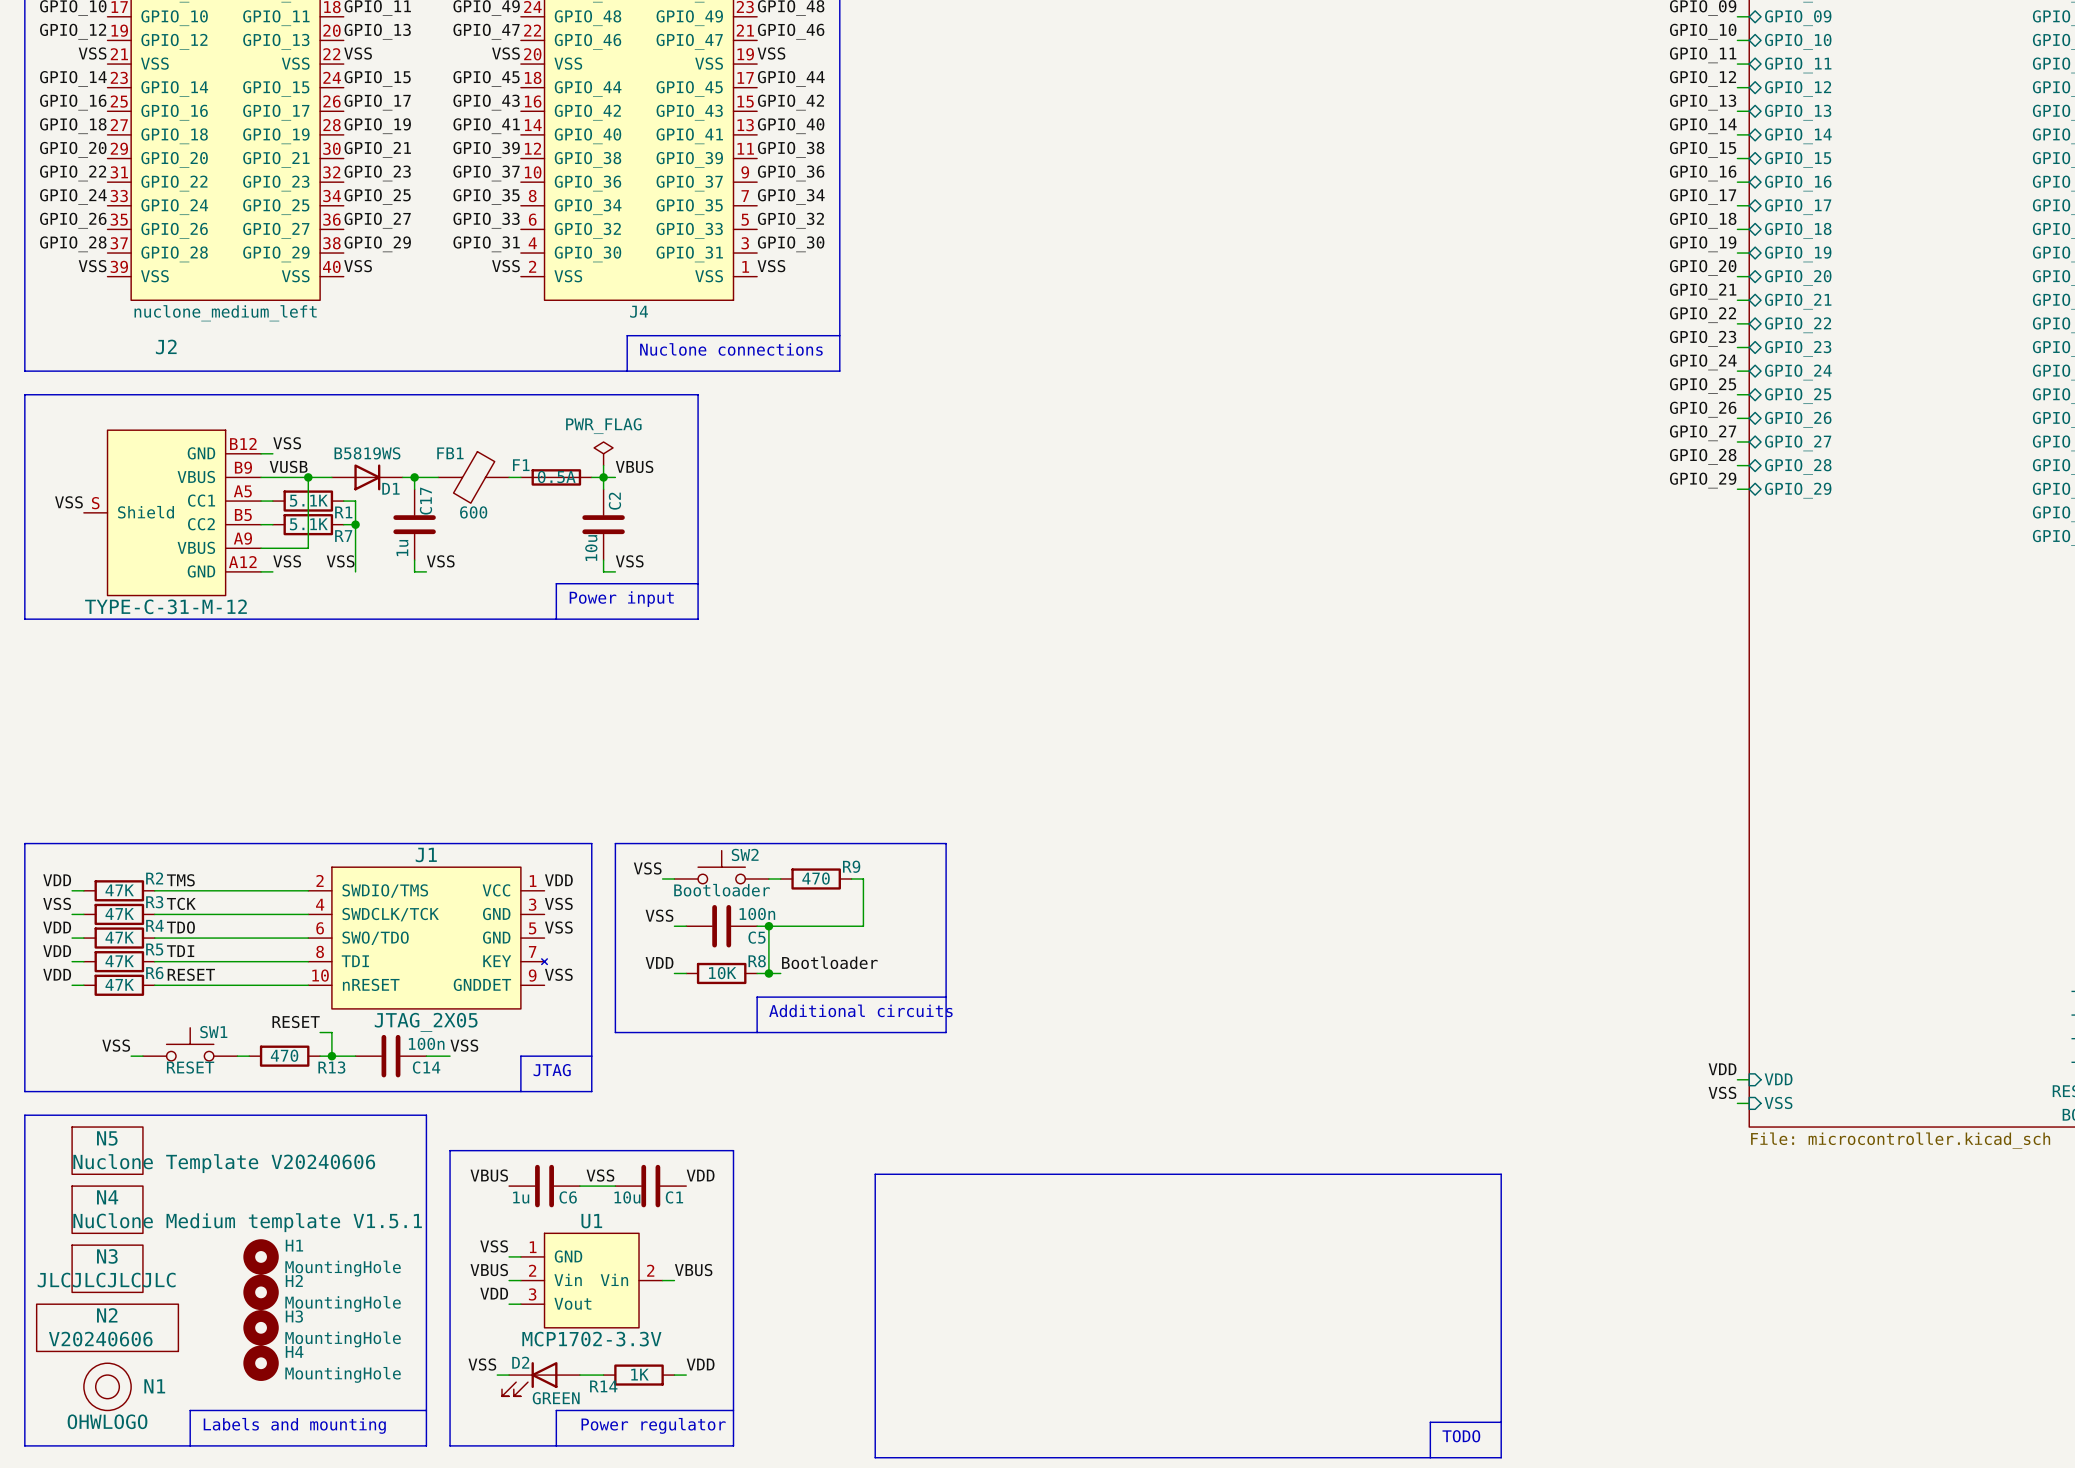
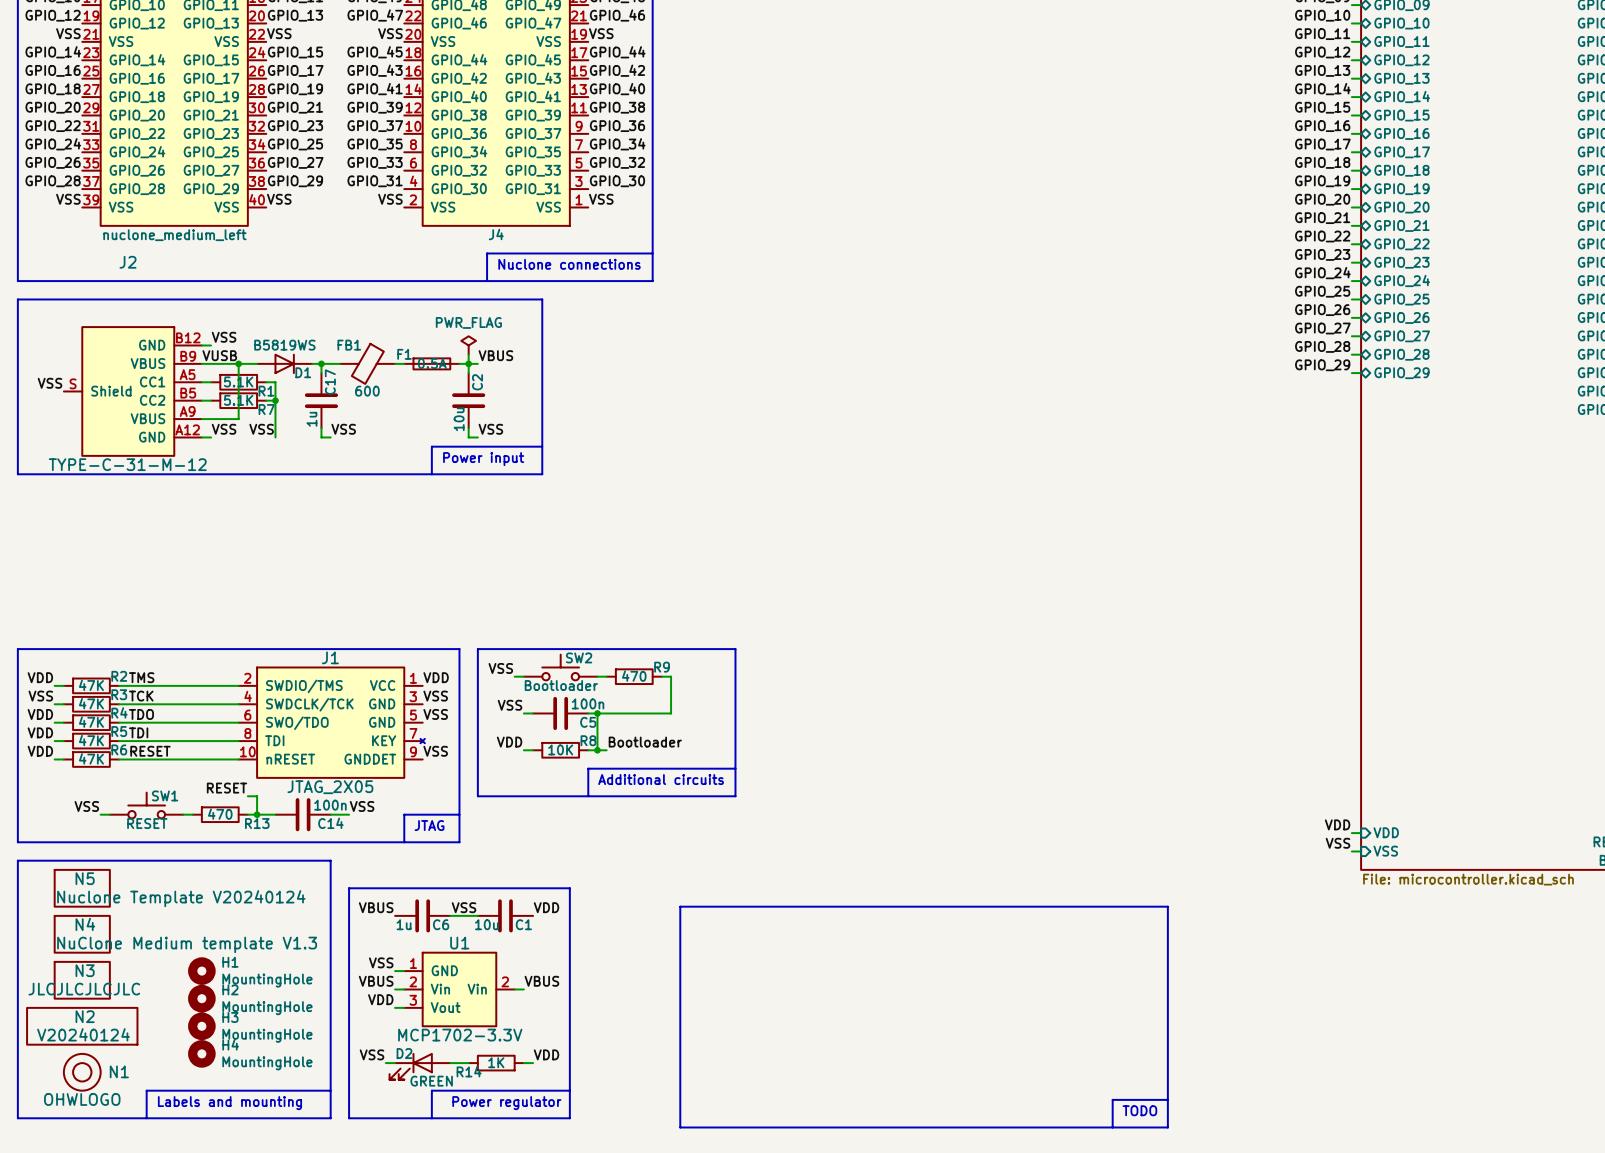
N5 value: Nuclone Template V20240606 (224, 1163) -> Nuclone Template V20240124 (181, 898)
N4 value: NuClone Medium template V1.5.1 (247, 1222) -> NuClone Medium template V1.3 (187, 944)
N2 value: V20240606 (100, 1339) -> V20240124 (83, 1034)

